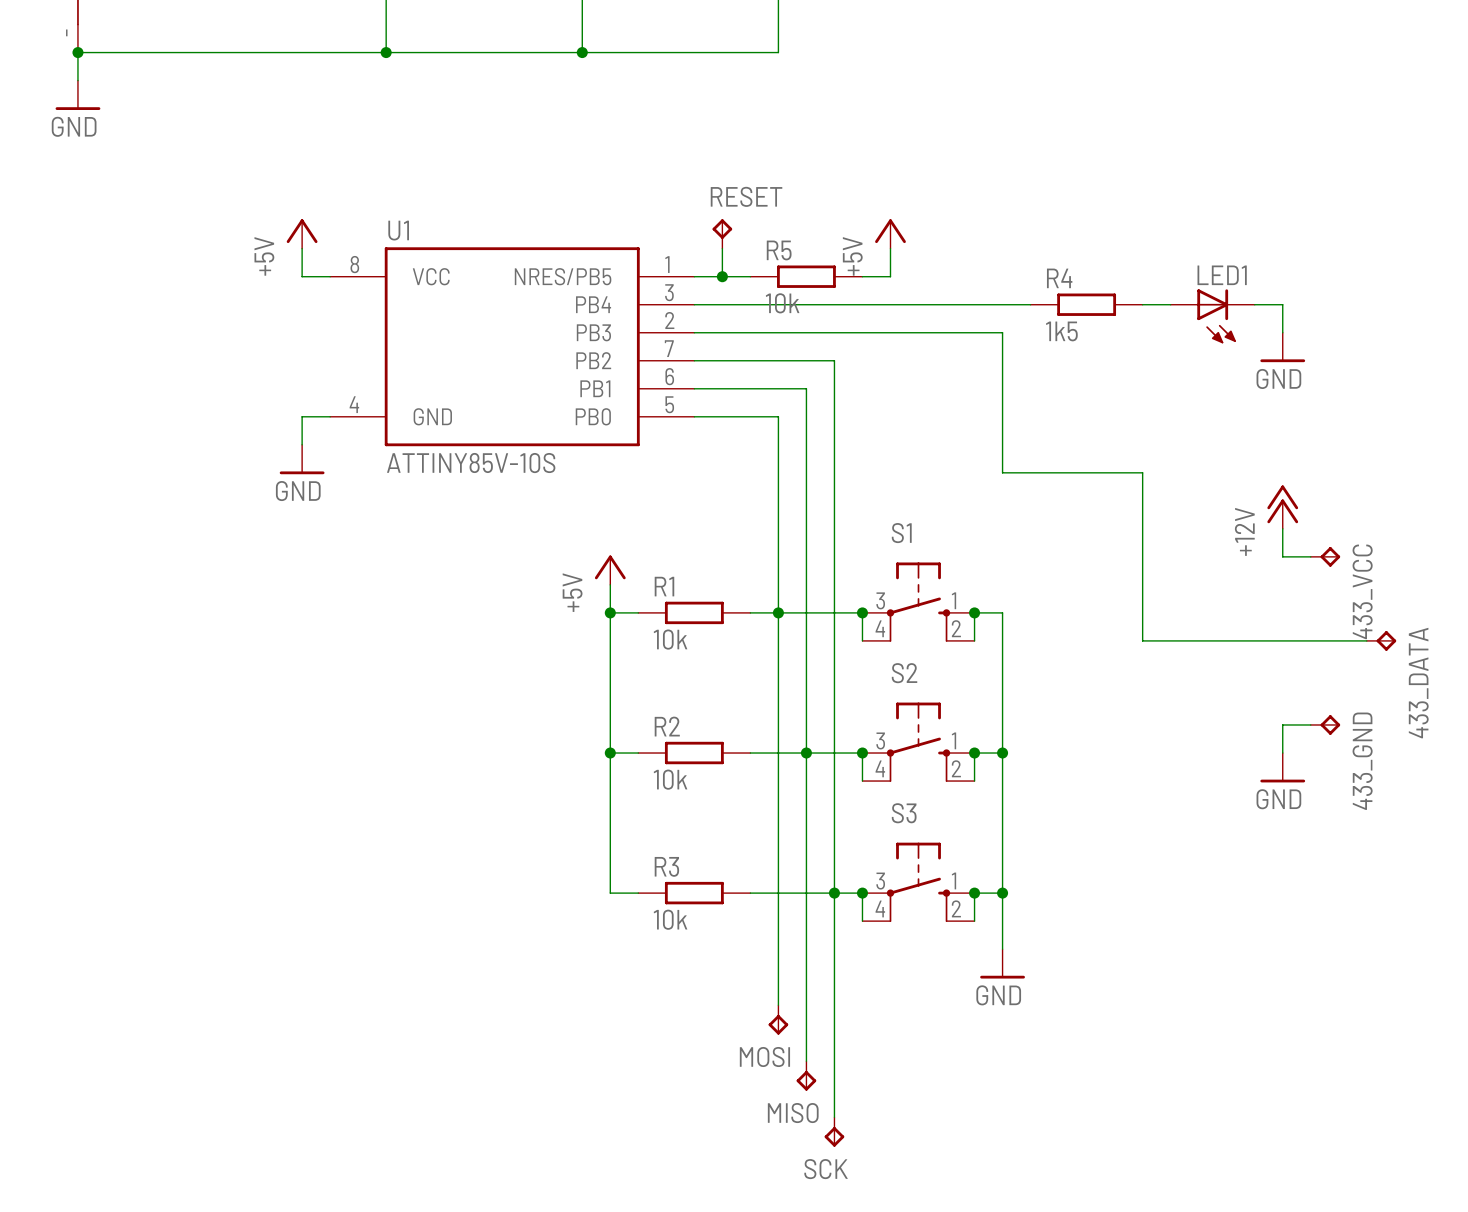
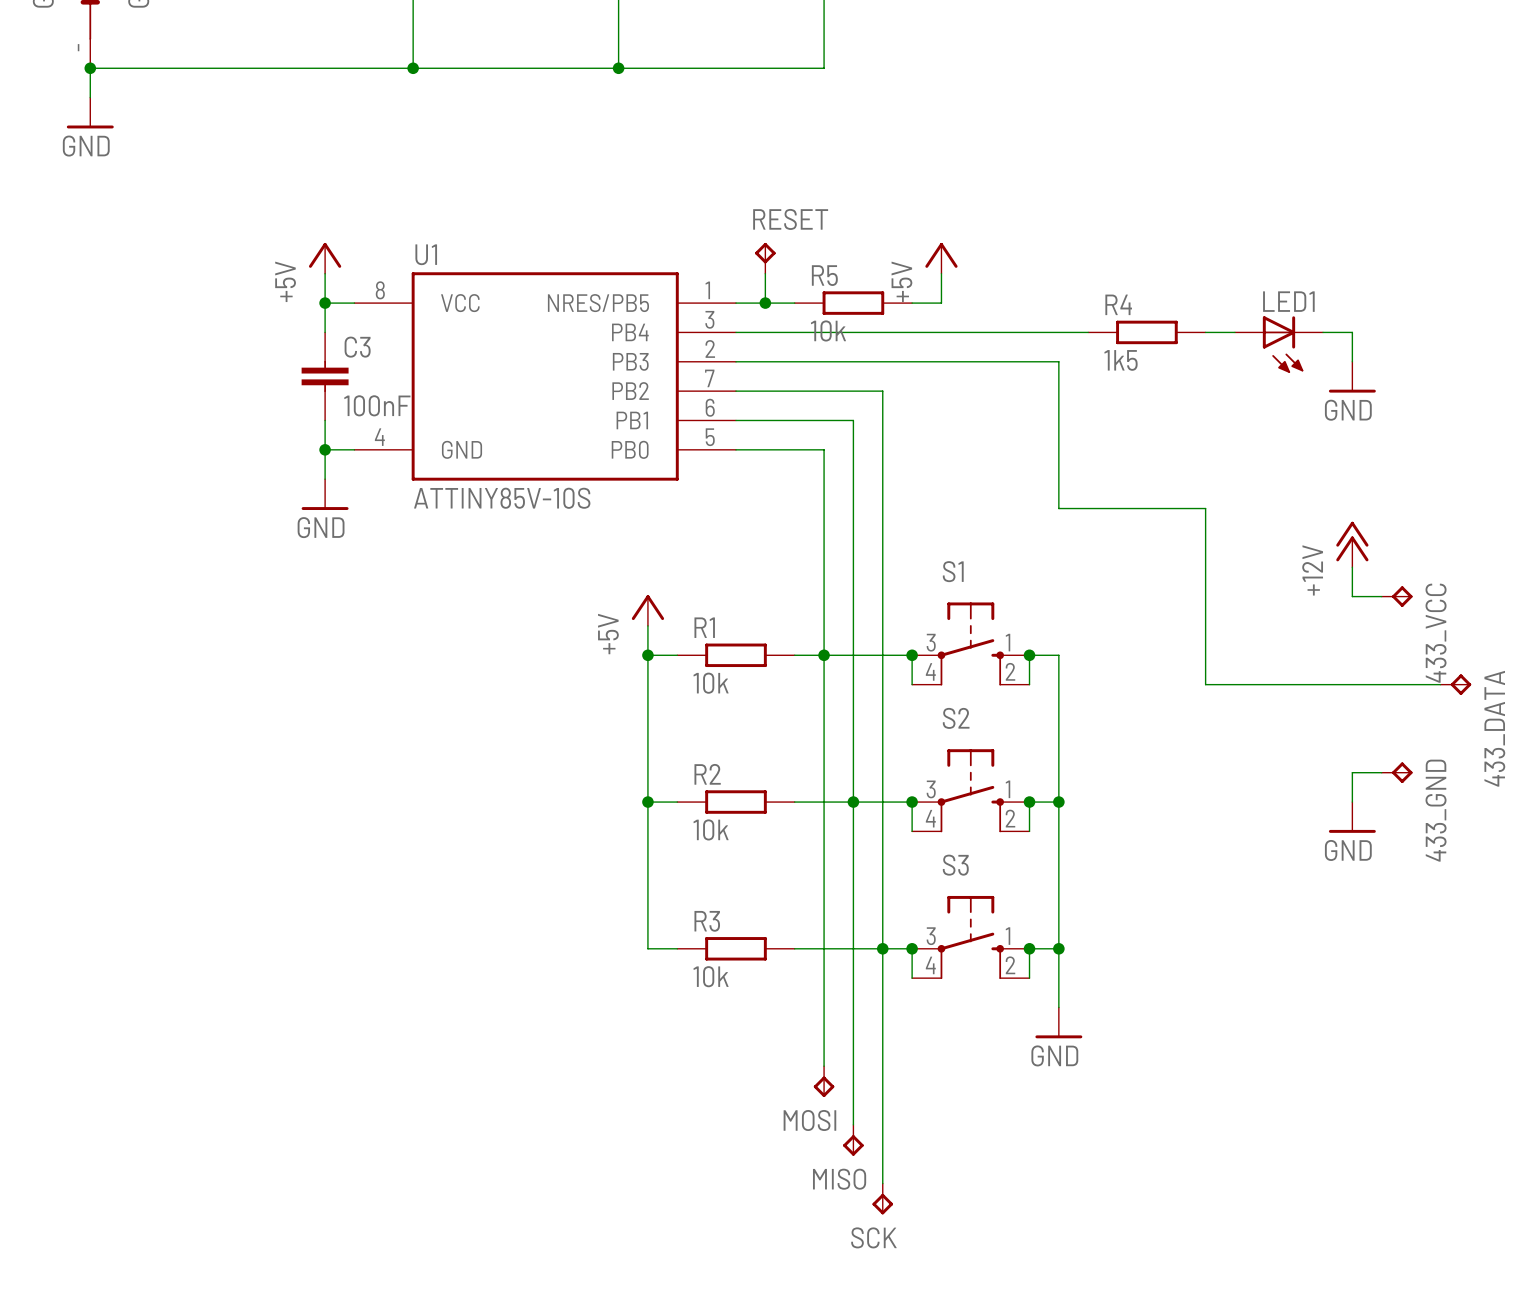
wire: none -> (325, 303) (325, 332)
junction: none -> (325, 303)
C3: none -> 100nF (325, 376)
wire: none -> (325, 420) (325, 449)
junction: none -> (325, 449)

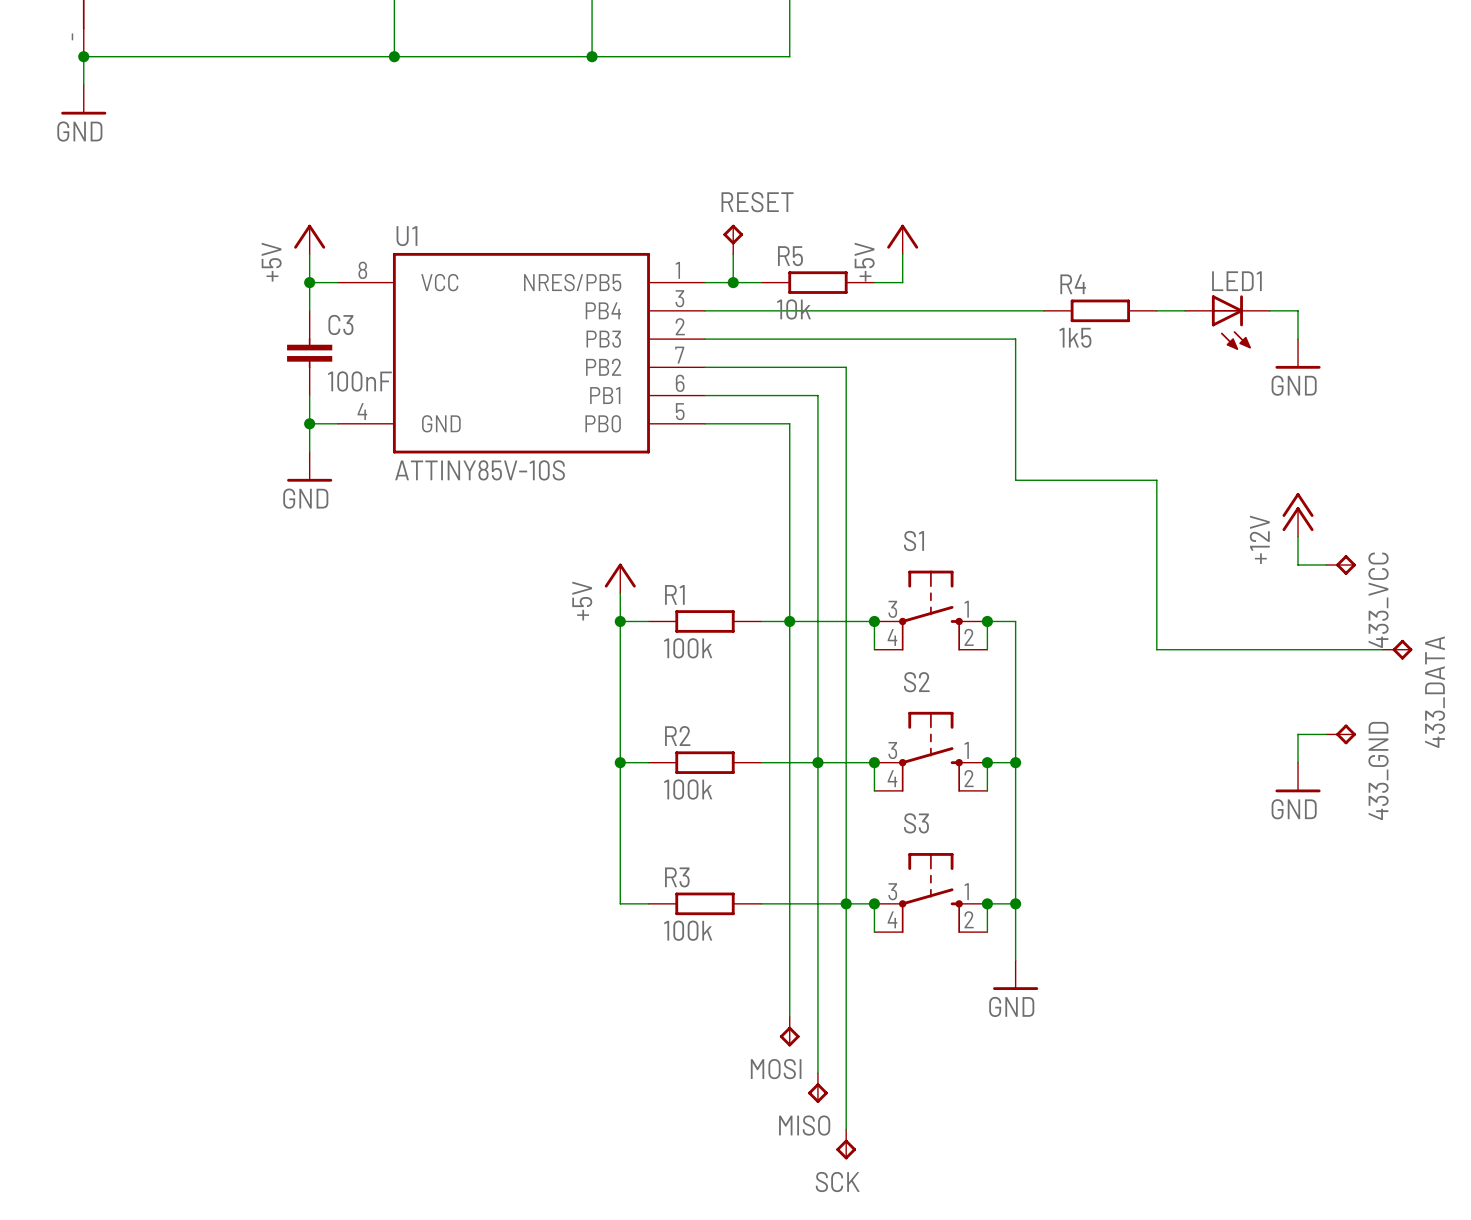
R1 value: 10k (711, 683) -> 100k (688, 648)
R2 value: 10k (711, 829) -> 100k (688, 789)
R3 value: 10k (711, 976) -> 100k (688, 930)

